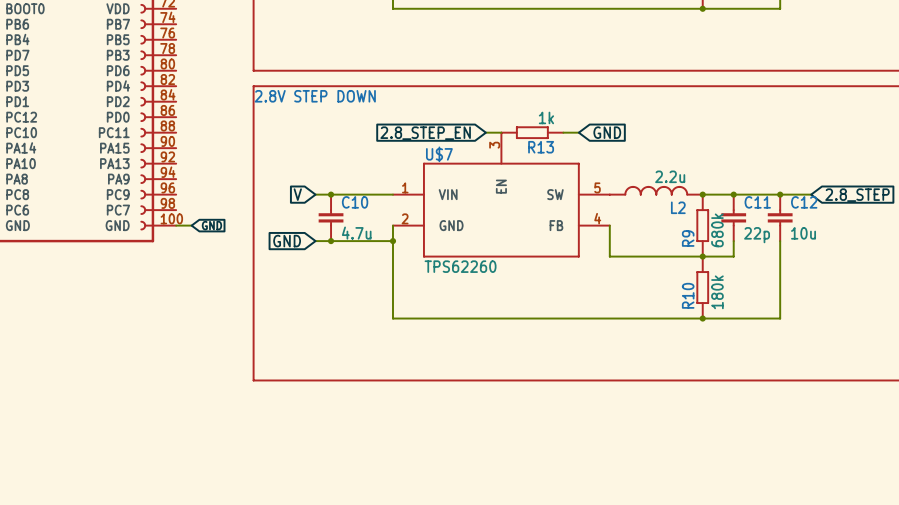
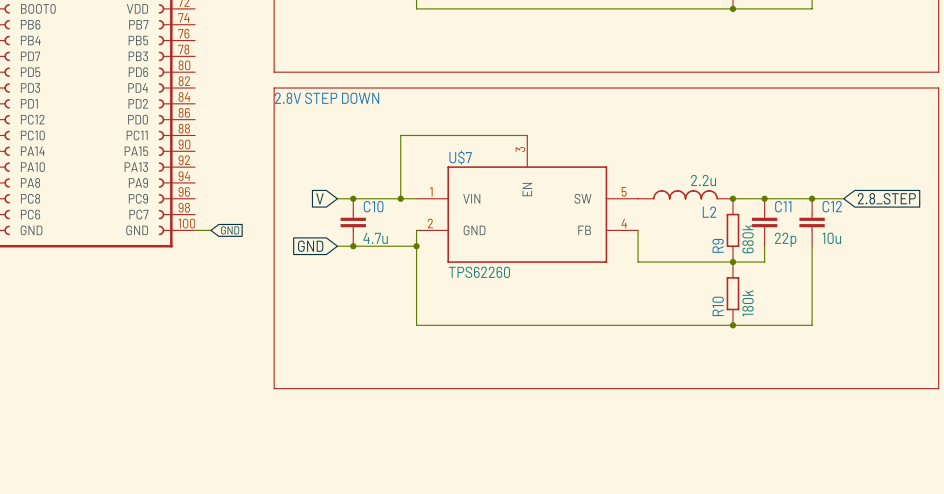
wire: none -> (511, 135) (400, 135) (400, 198)
R13: 1k (532, 132) -> none
wire: (563, 132) (578, 132) -> none
global label: GND (607, 132) -> none
global label: 2.8_STEP_EN (425, 133) -> none
junction: none -> (400, 198)

